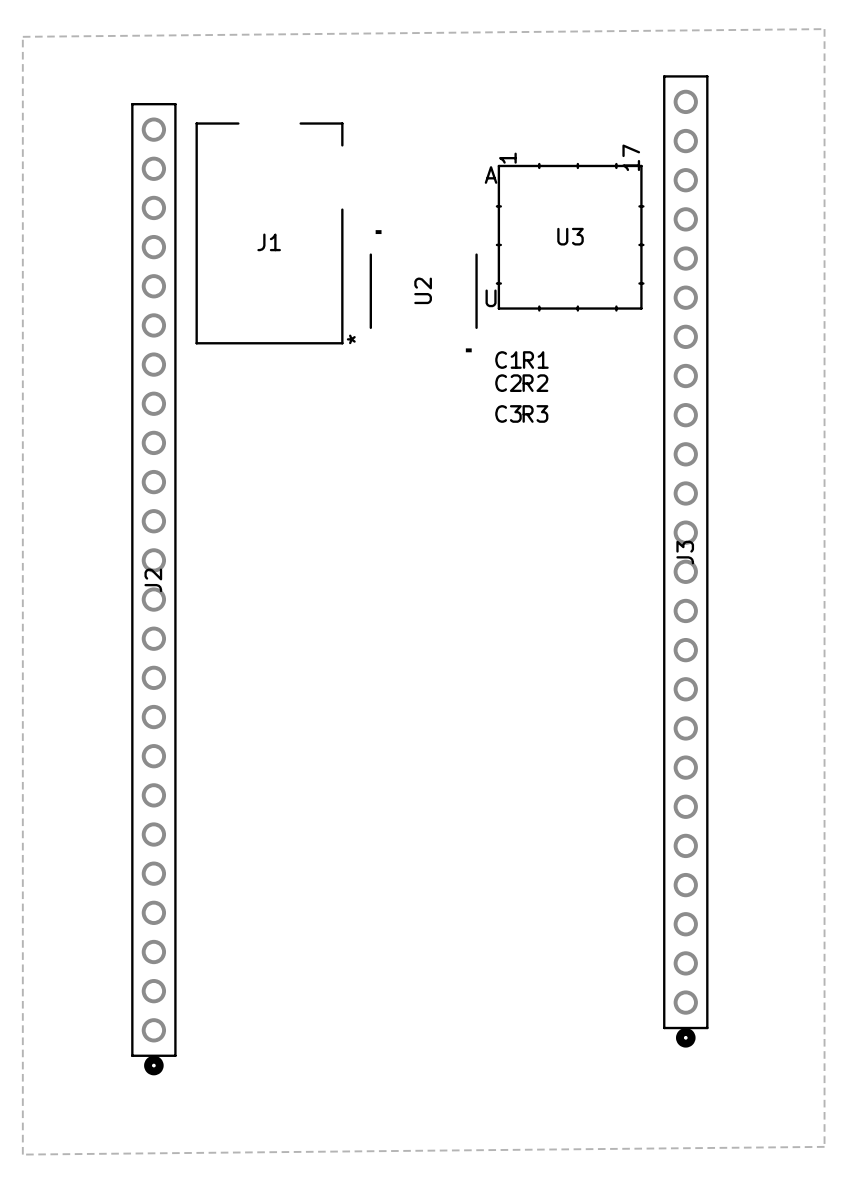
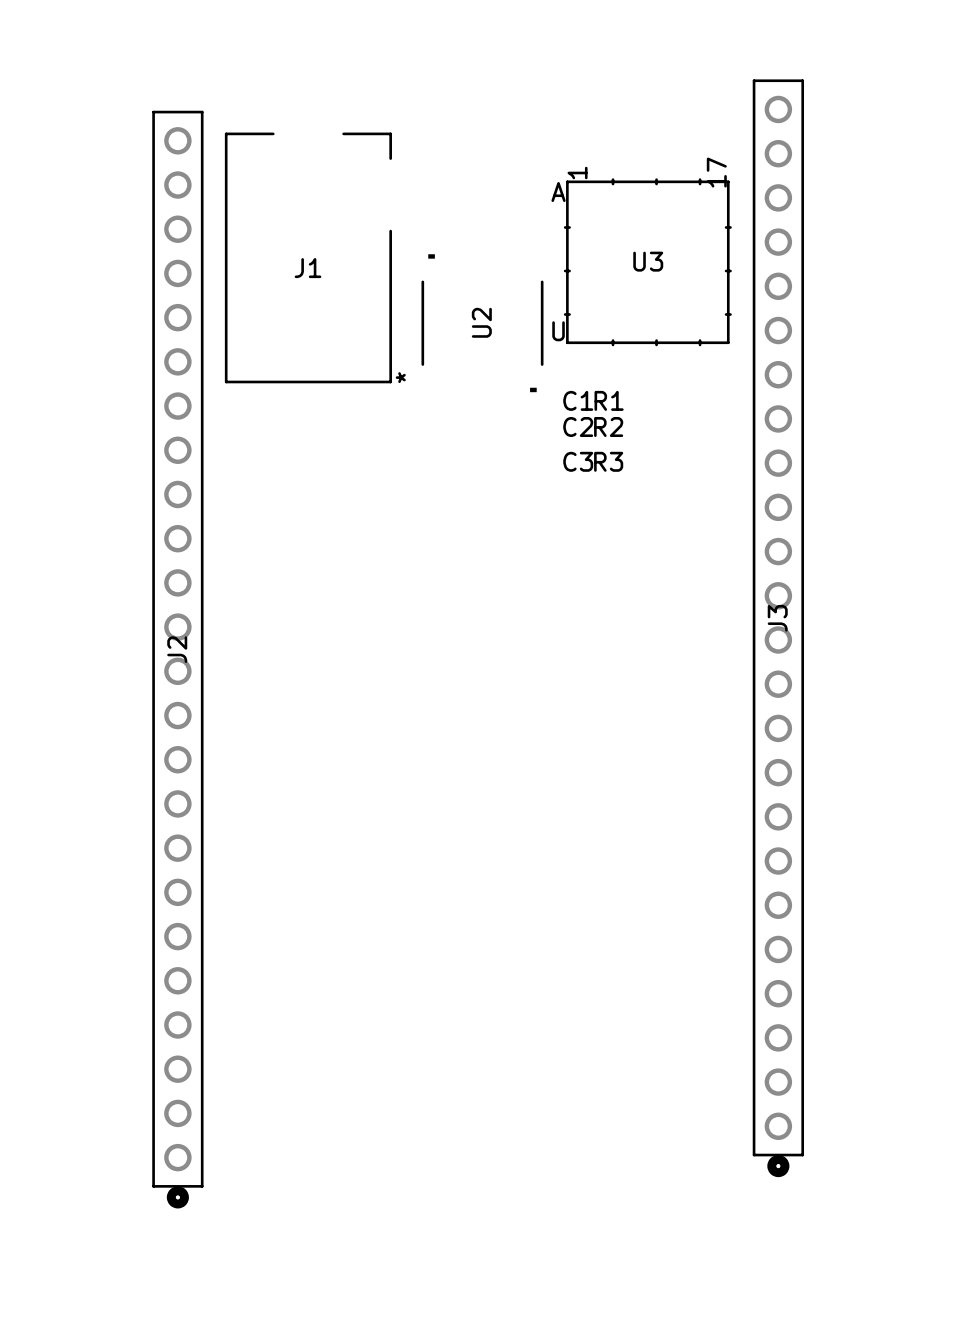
zone outline: (824, 29) (22, 36) (22, 1154) (824, 1146) (824, 29) -> none

